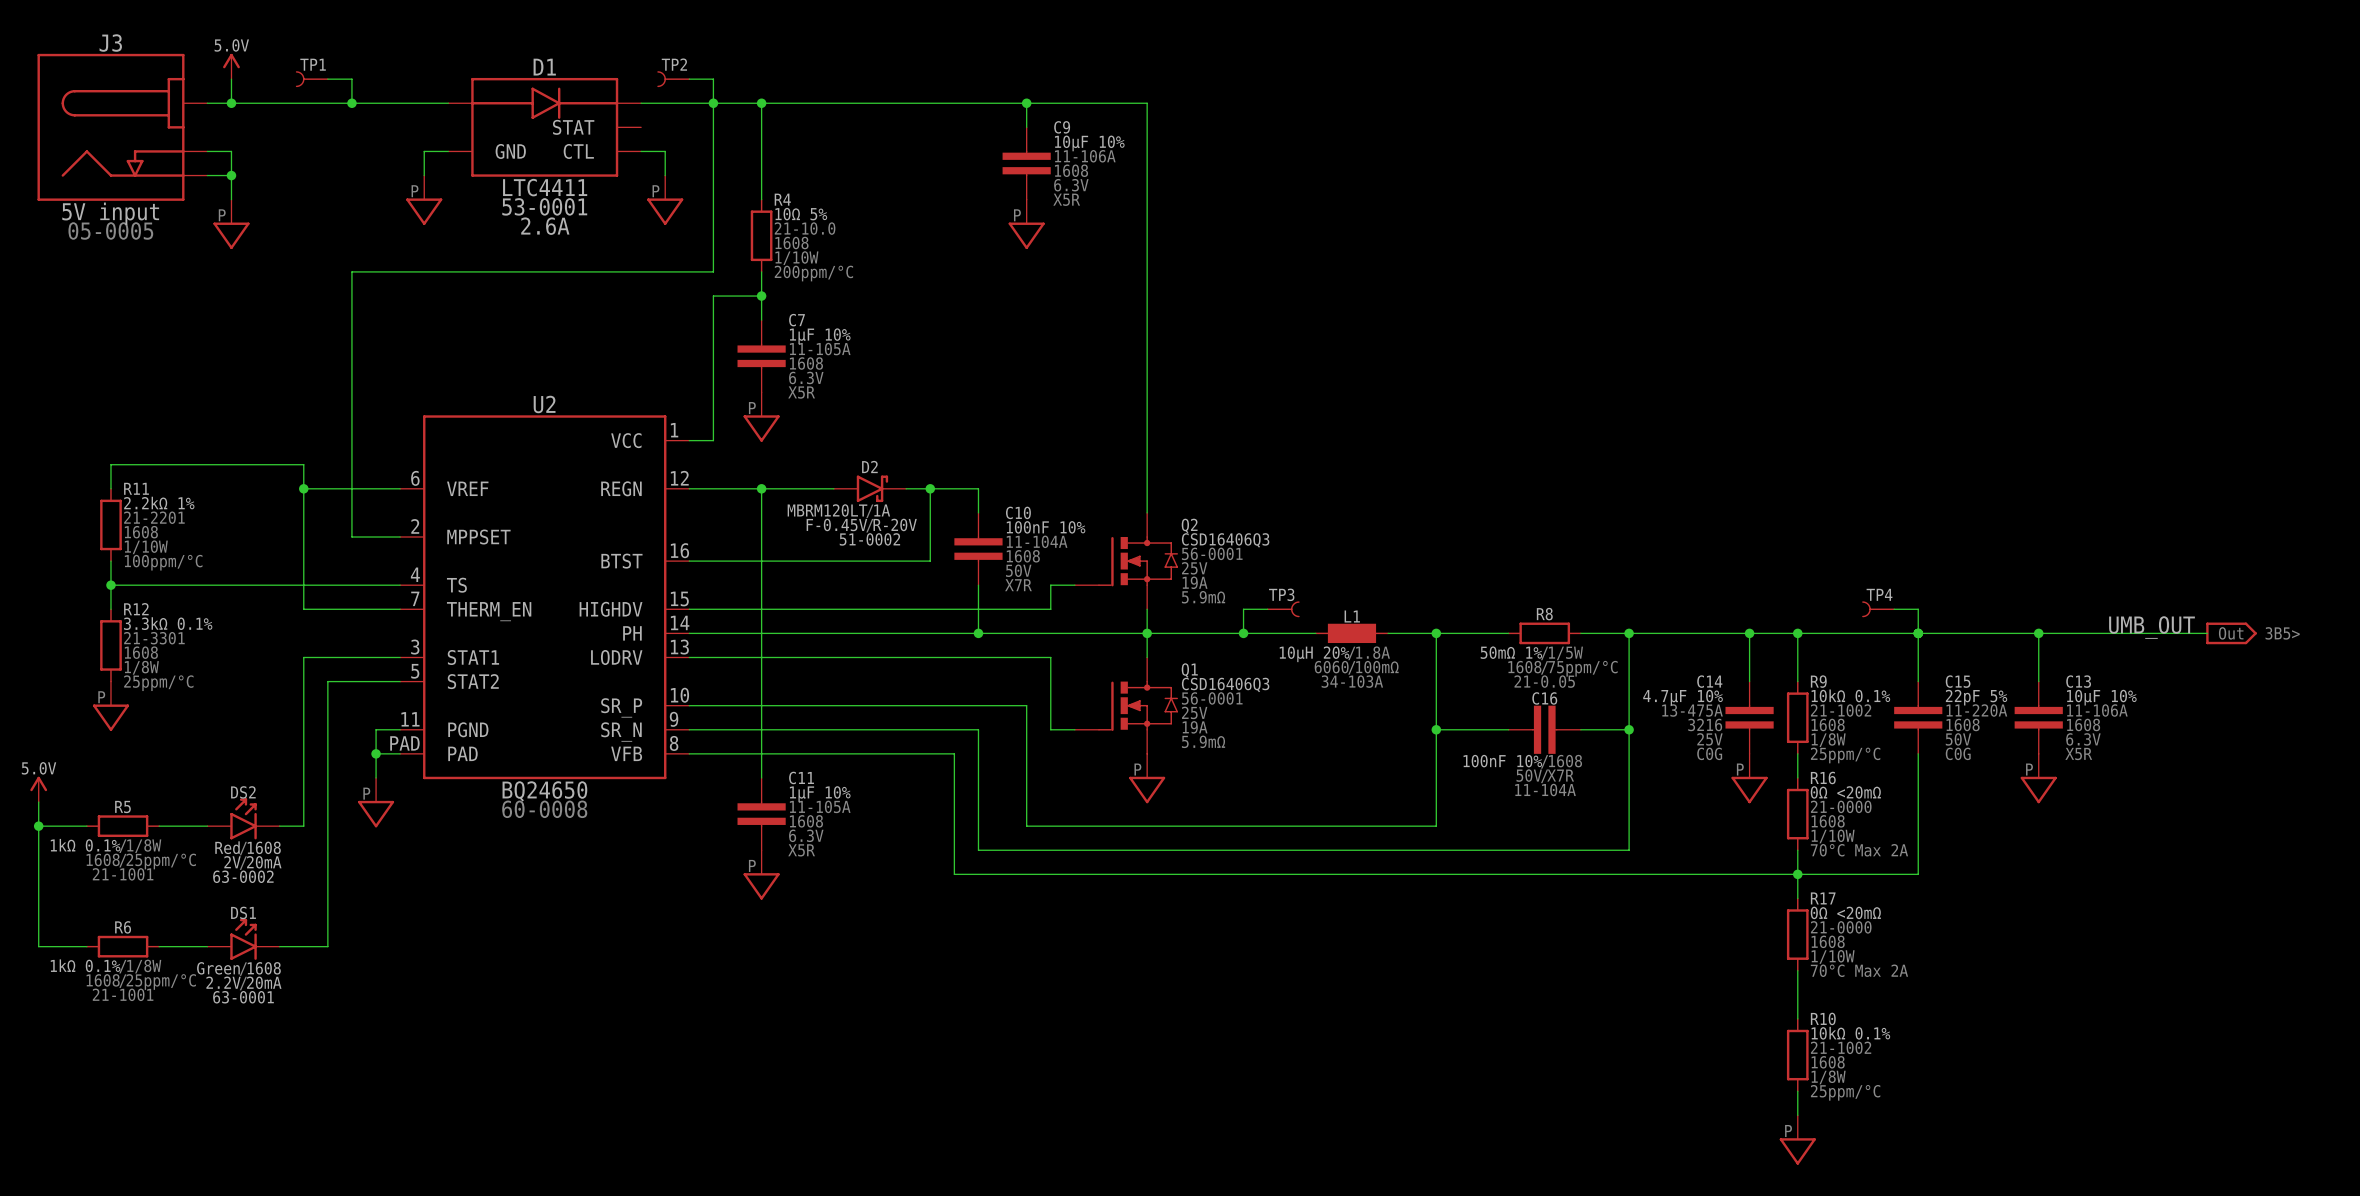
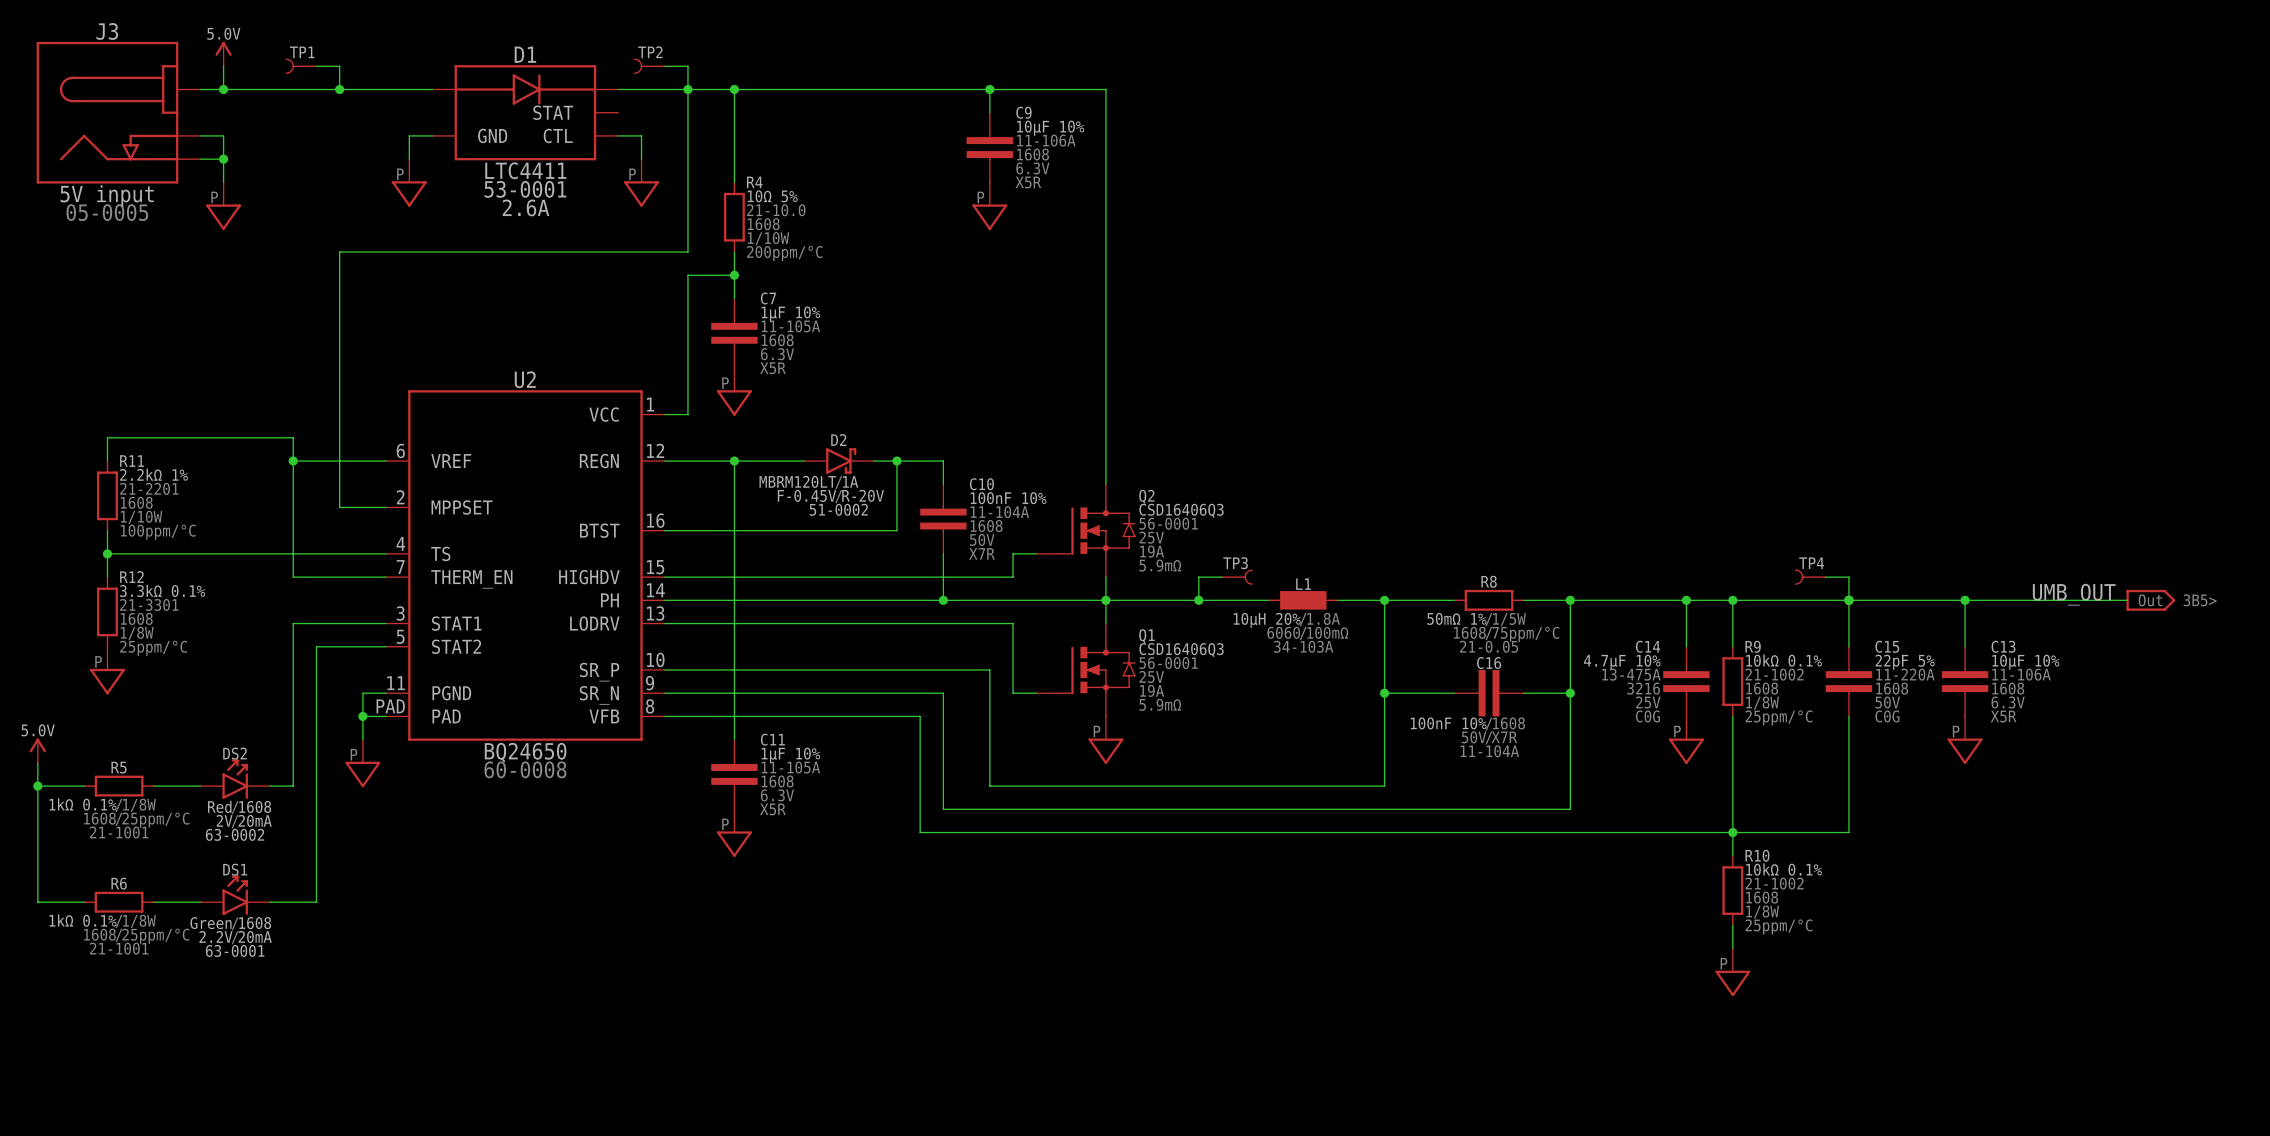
wire: none -> (1732, 739) (1732, 809)
R16: 0Ω <20mΩ (1797, 814) -> none
R17 name: R17 (1823, 898) -> R10 (1757, 855)
R17 value: 0Ω <20mΩ (1845, 912) -> 10kΩ 0.1% (1784, 869)
R17 text: 21-0000 (1841, 927) -> 21-1002 (1774, 883)
R17 text: 1/10W (1833, 956) -> 1/8W (1762, 912)
R17 text: 70°C Max 2A (1859, 970) -> 25ppm/°C (1778, 926)
R10: 10kΩ 0.1% (1797, 1055) -> none
wire: (1797, 1091) (1797, 1115) -> none
power symbol position: (1797, 1140) -> (1732, 972)

